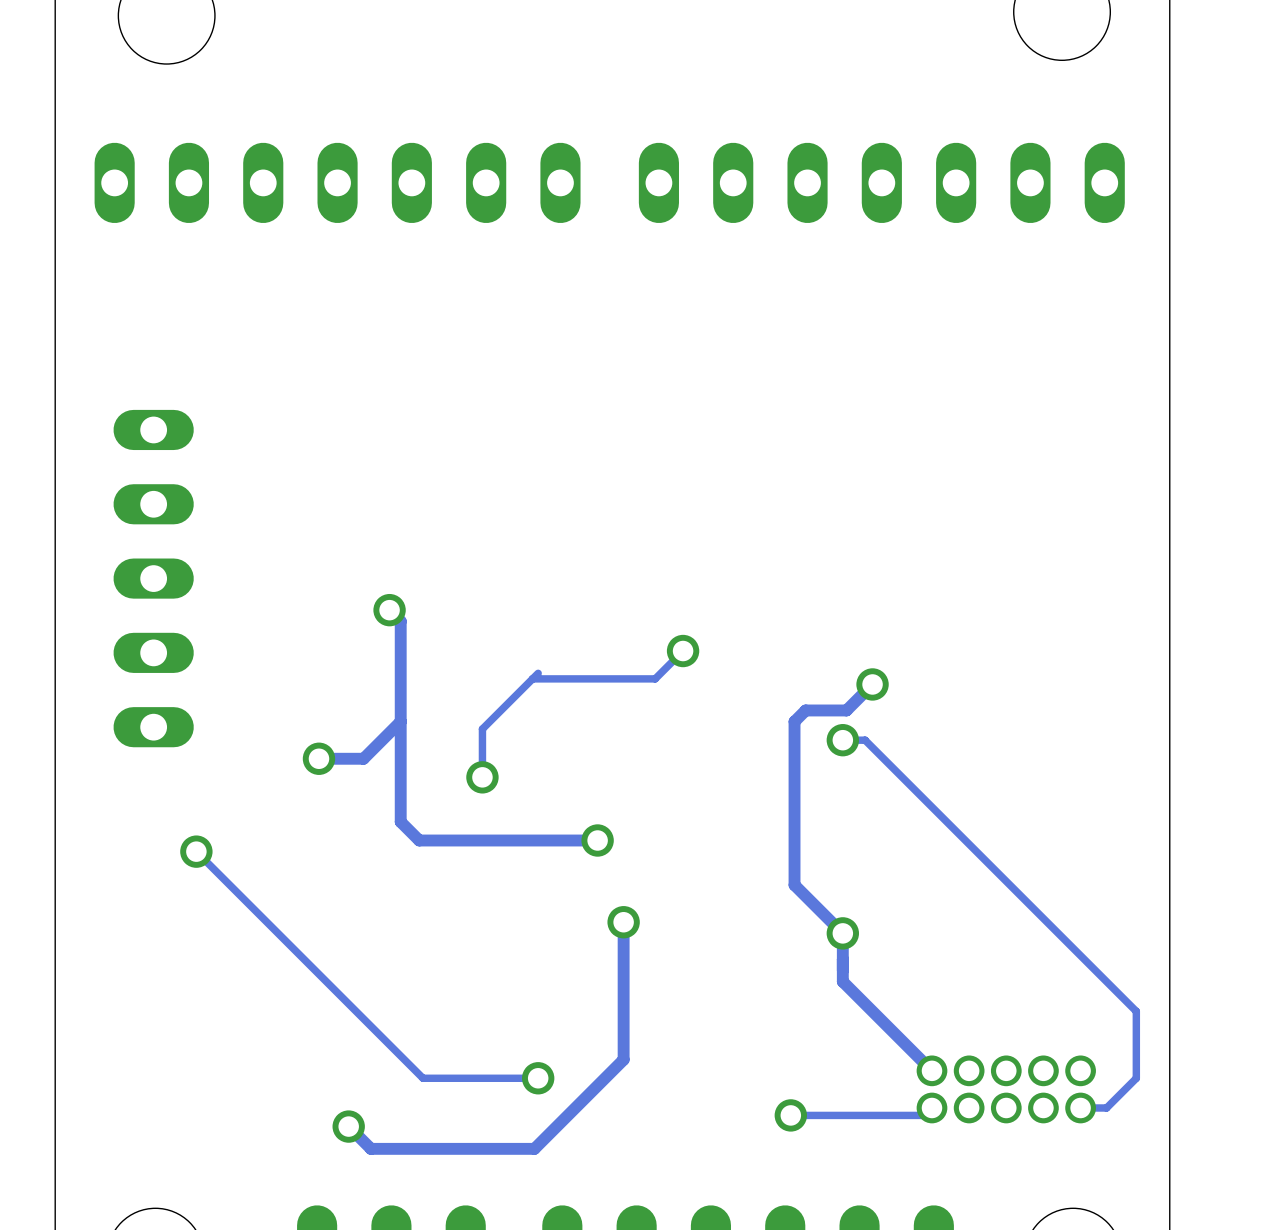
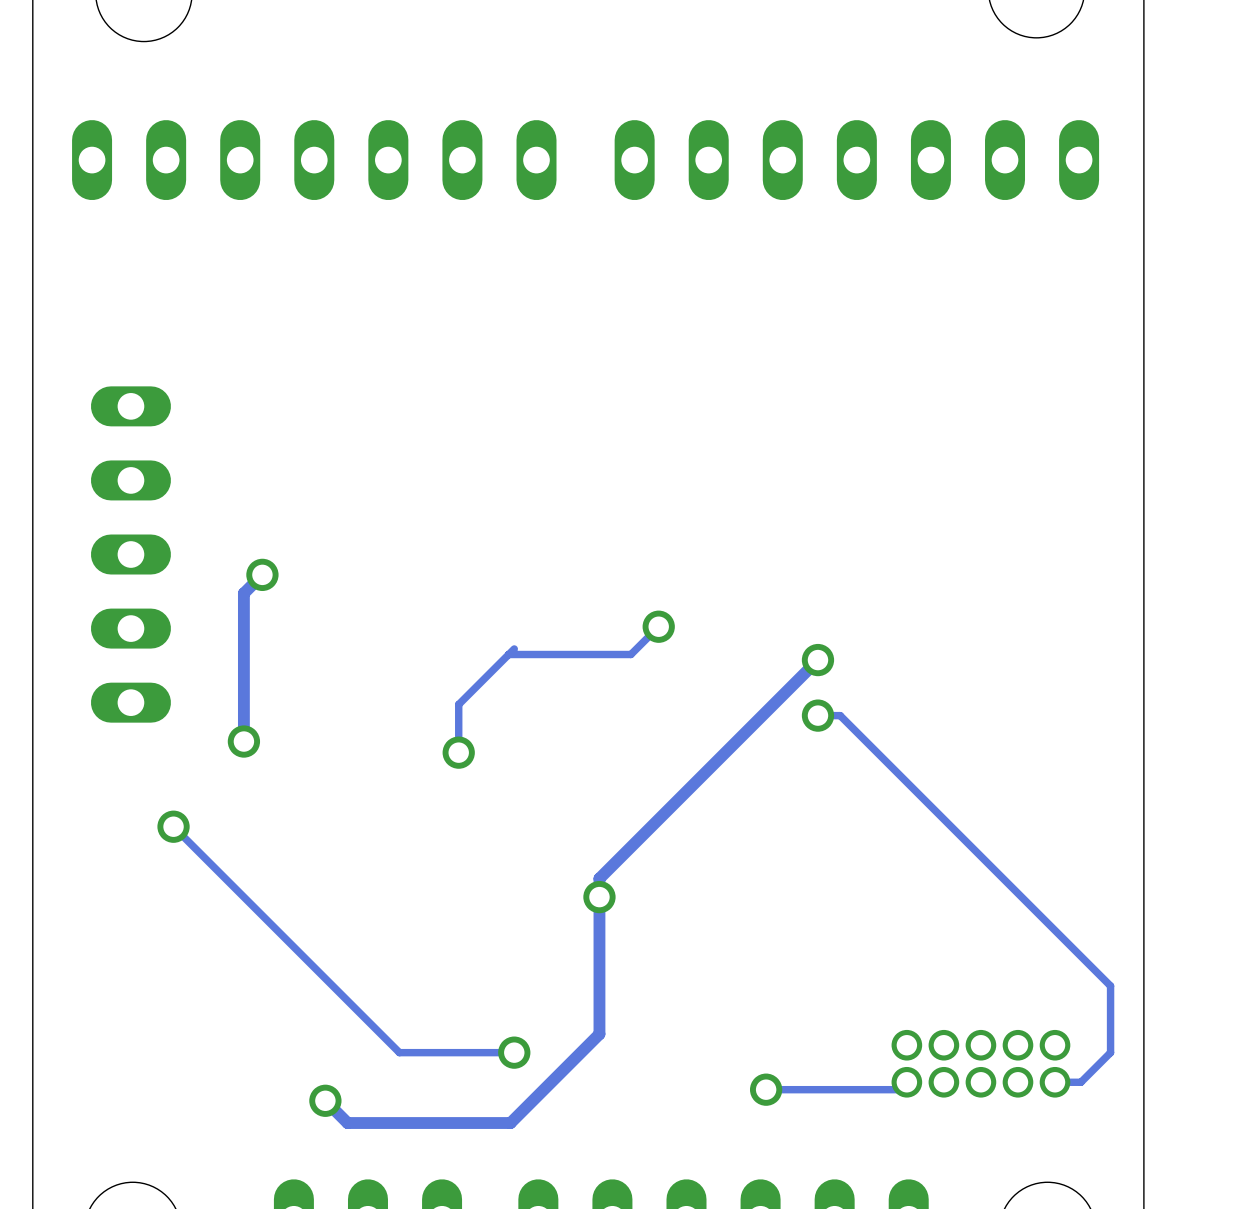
track: none -> (262, 574) (243, 593) (243, 741)
via: none -> (262, 574)
track: (389, 610) (400, 621) (400, 821) (419, 840) (597, 840) -> none
via: (389, 610) -> none
track: none -> (817, 660) (599, 878) (599, 897)
track: (872, 684) (846, 710) (805, 710) (794, 721) (794, 885) (842, 933) (842, 981) (931, 1070) -> none
via position: (872, 684) -> (817, 660)
track: (400, 721) (363, 758) (318, 758) -> none
via position: (318, 758) -> (243, 741)
via: (597, 840) -> none
via: (842, 933) -> none

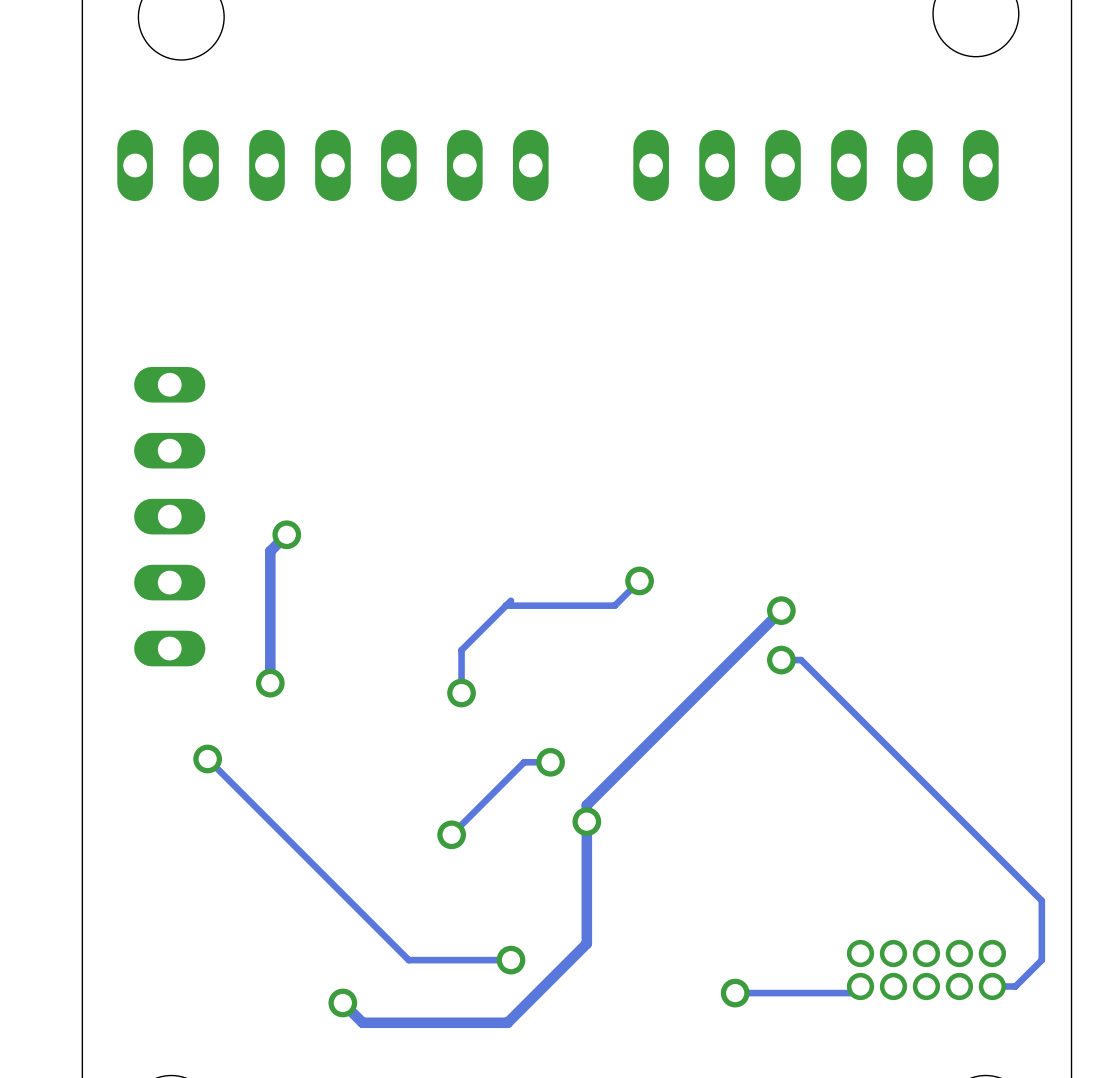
part footprint: [614, 120, 1100, 201] -> [633, 129, 999, 202]
track: none -> (550, 762) (524, 762) (451, 834)
via: none -> (550, 762)
via: none -> (451, 834)

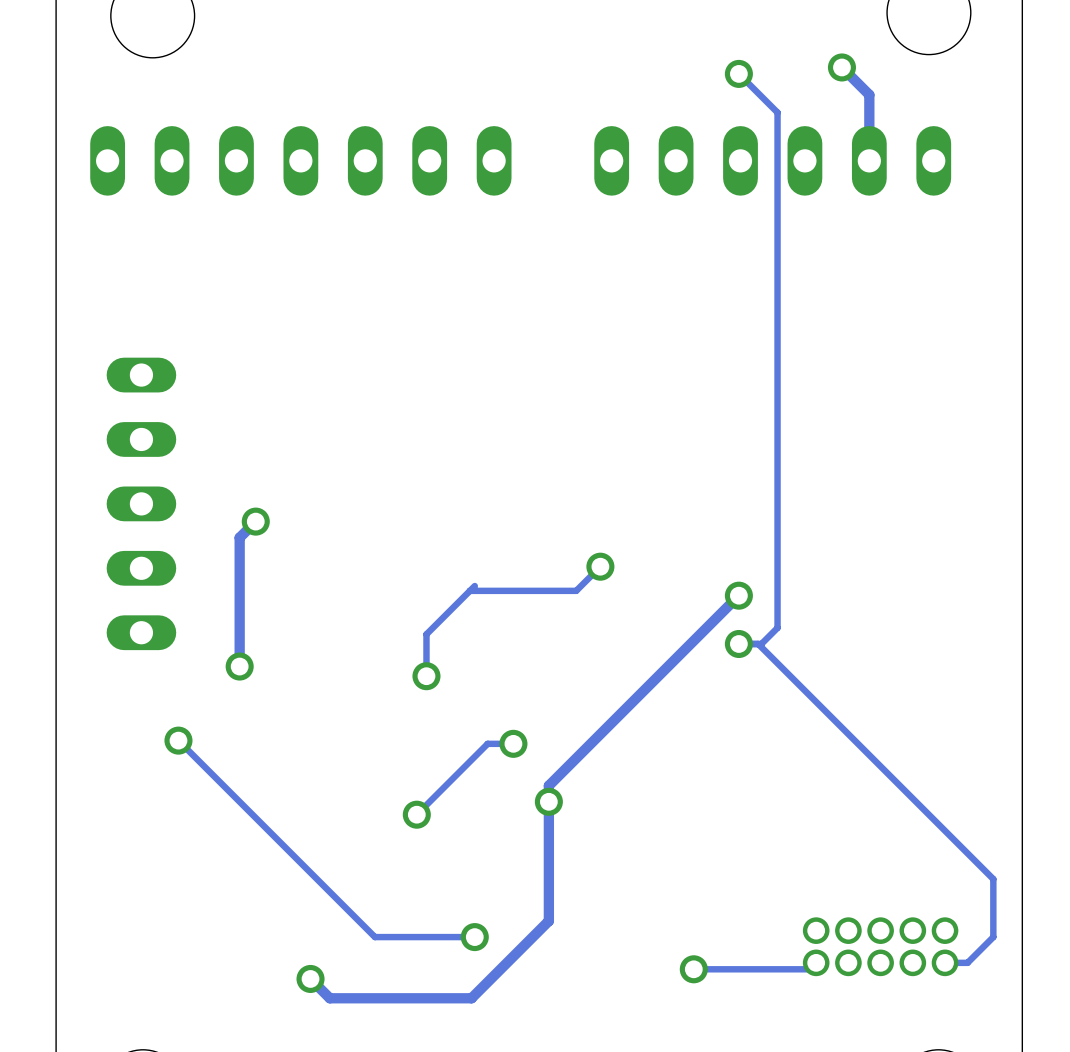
track: none -> (841, 67) (869, 94) (869, 160)
via: none -> (841, 67)
track: none -> (738, 73) (777, 112) (777, 627) (761, 643) (758, 643)
via: none -> (738, 73)

